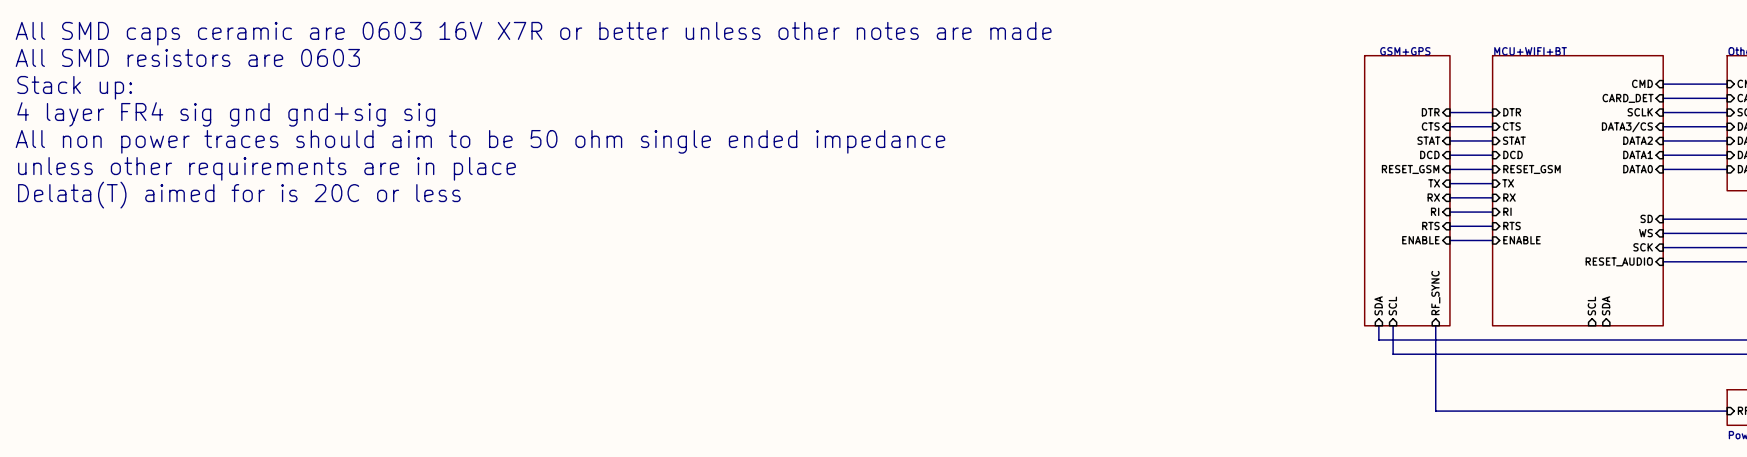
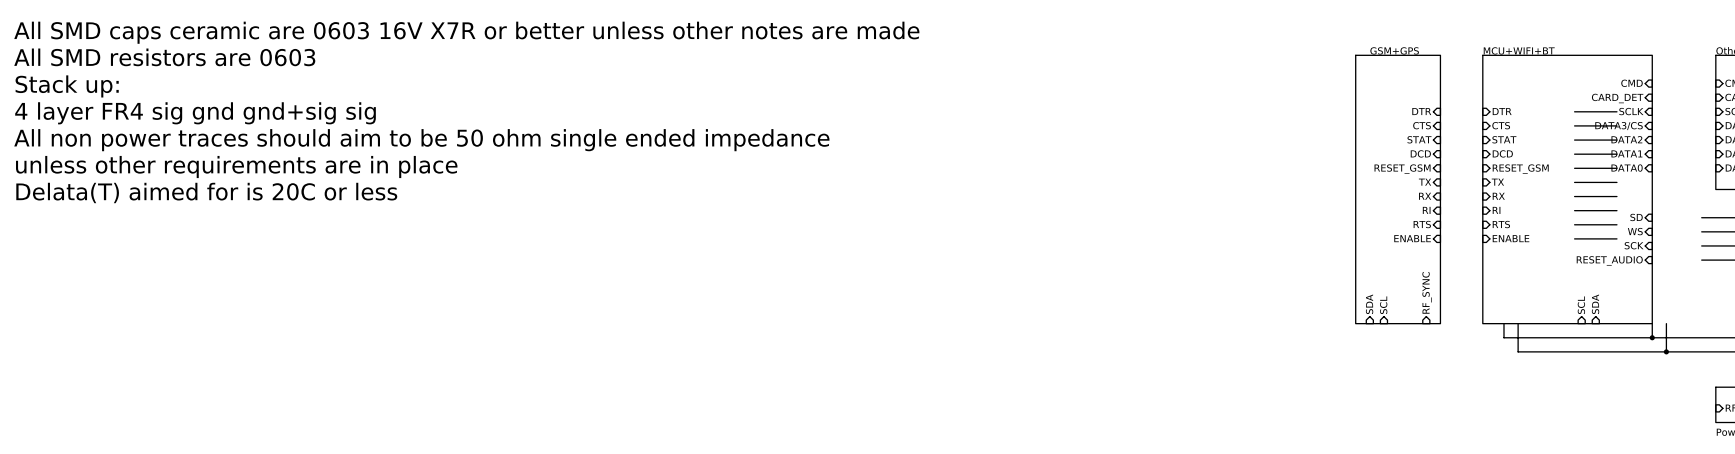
wire: (1663, 84) (1727, 84) -> none
wire: (1663, 98) (1727, 98) -> none
wire: (1449, 112) (1492, 112) -> (1574, 111) (1616, 111)
wire: (1663, 112) (1727, 112) -> none
wire: (1449, 126) (1492, 126) -> (1574, 125) (1616, 125)
wire: (1663, 126) (1727, 126) -> none
wire: (1449, 140) (1492, 140) -> (1574, 140) (1616, 140)
wire: (1663, 140) (1727, 140) -> none
wire: (1449, 155) (1492, 155) -> (1574, 154) (1616, 154)
wire: (1663, 155) (1727, 155) -> none
wire: (1449, 169) (1492, 169) -> (1574, 168) (1616, 168)
wire: (1663, 169) (1727, 169) -> none
wire: (1449, 183) (1492, 183) -> (1574, 182) (1616, 182)
wire: (1449, 197) (1492, 197) -> (1574, 196) (1616, 196)
wire: (1449, 212) (1492, 212) -> (1574, 210) (1616, 210)
wire: (1663, 219) (1712, 219) -> none
wire: (1449, 226) (1492, 226) -> (1574, 224) (1616, 224)
wire: (1663, 233) (1712, 233) -> none
wire: (1449, 240) (1492, 240) -> (1574, 238) (1616, 238)
wire: (1663, 247) (1712, 247) -> none
wire: (1663, 261) (1712, 261) -> none
wire: (1378, 325) (1378, 340) (1513, 340) -> (1503, 323) (1503, 337)
wire: (1393, 325) (1393, 354) (1528, 354) -> (1518, 323) (1518, 351)
wire: (1435, 325) (1435, 411) (1727, 411) -> none
wire: none -> (1652, 323) (1652, 337)
wire: none -> (1666, 323) (1666, 351)
junction: none -> (1652, 337)
junction: none -> (1666, 351)

